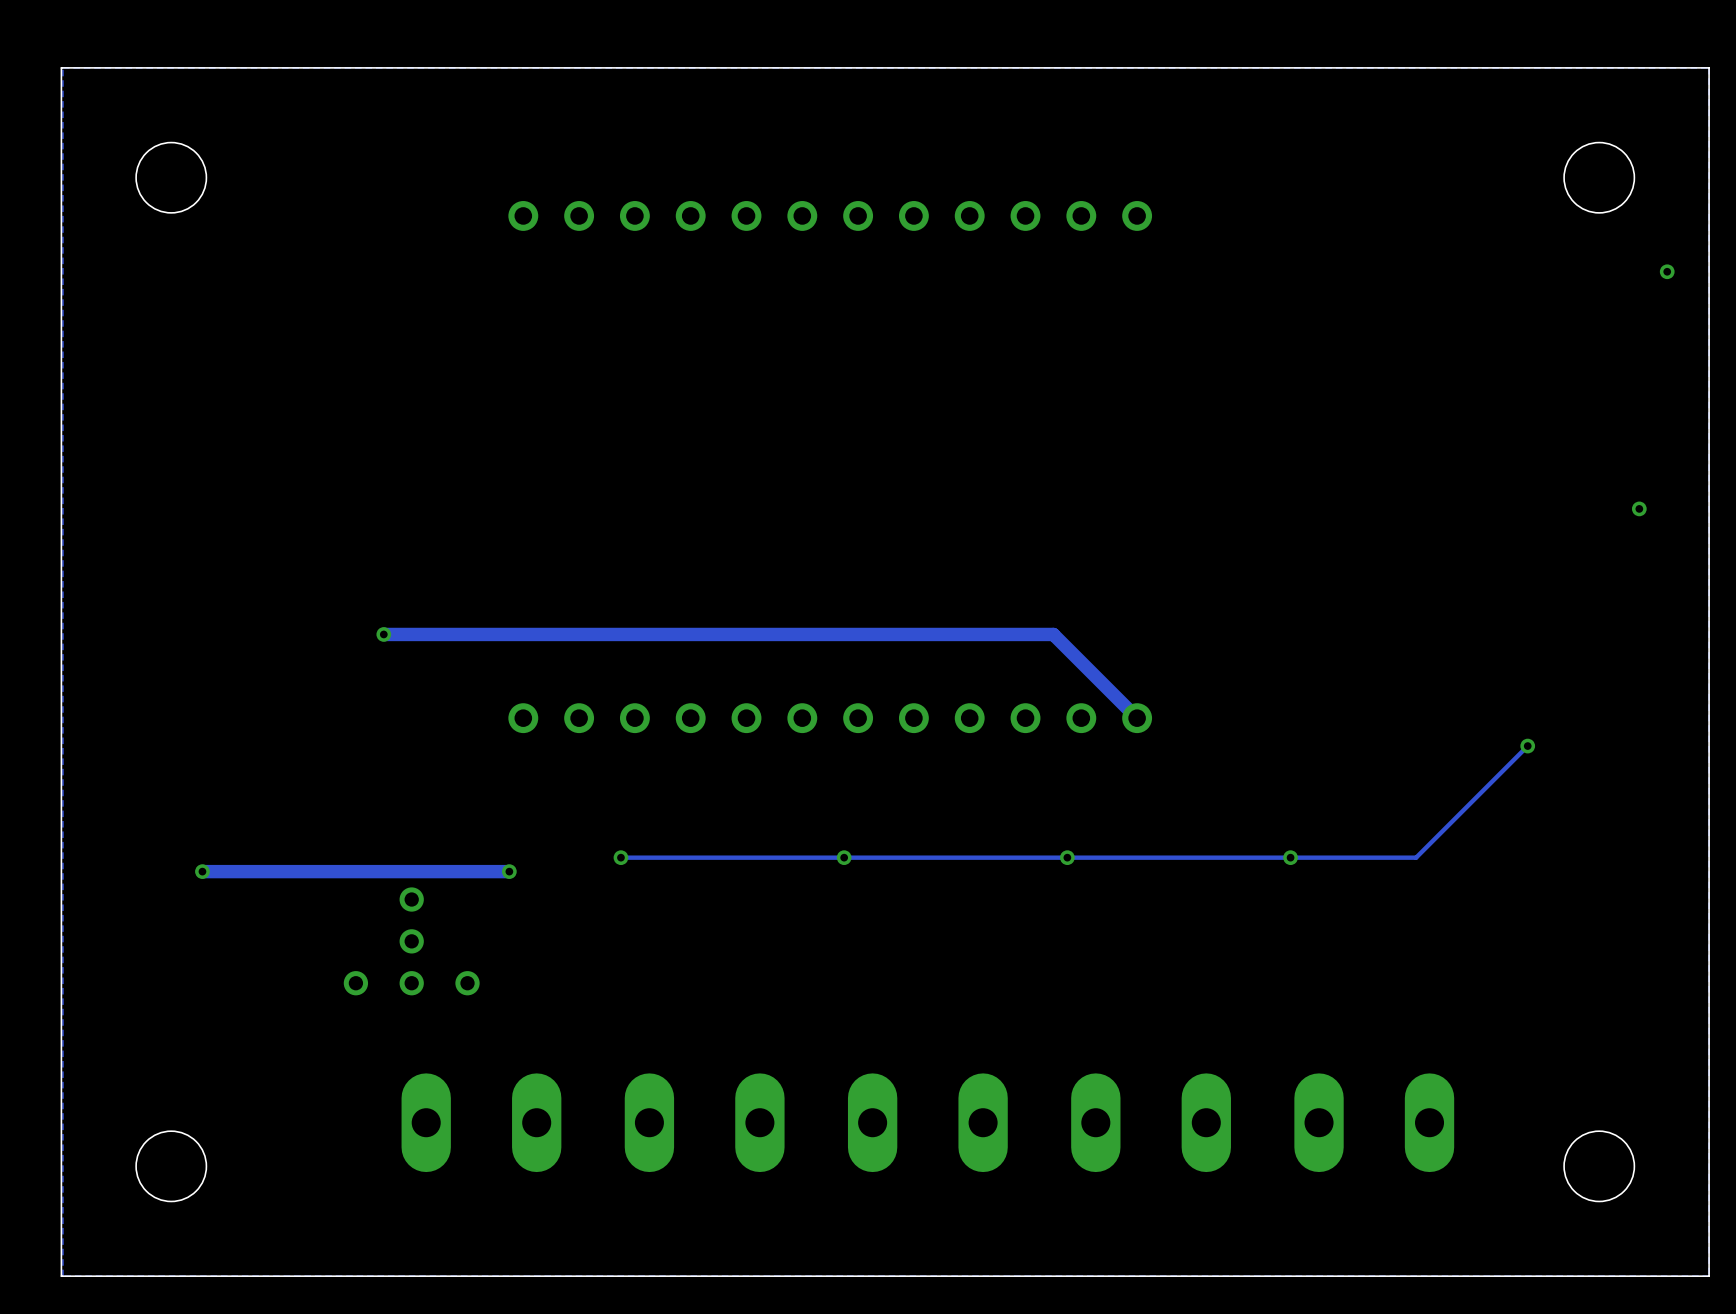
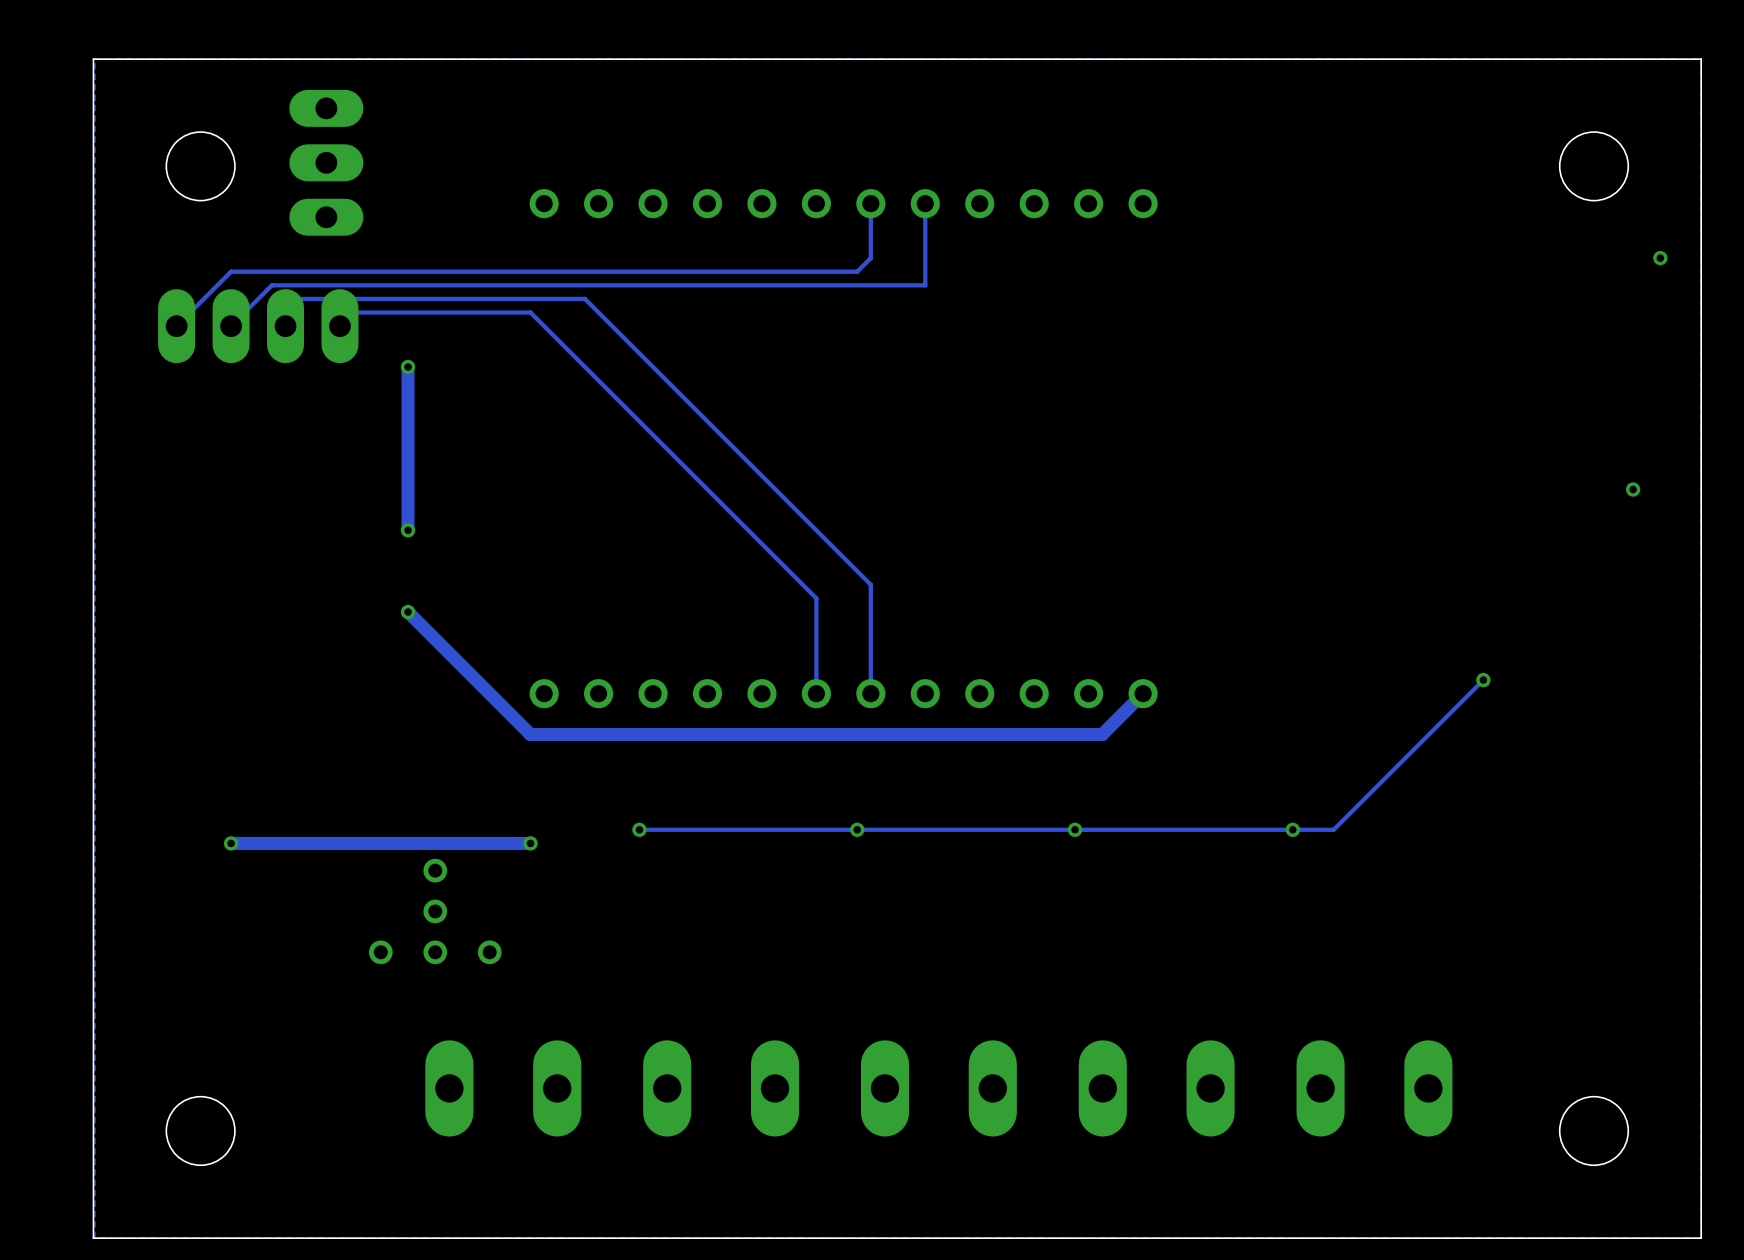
part: none -> (326, 162)
track: none -> (870, 203) (870, 258) (857, 271) (231, 271) (176, 326)
track: none -> (925, 203) (925, 285) (271, 285) (231, 326)
part: none -> (258, 326)
track: none -> (285, 326) (285, 312) (299, 298) (584, 298) (870, 584) (870, 693)
track: none -> (339, 326) (353, 312) (530, 312) (816, 598) (816, 693)
track: none -> (408, 366) (408, 530)
via: none -> (408, 366)
via: none -> (408, 530)
track: (383, 634) (1053, 634) (1137, 718) -> (408, 612) (530, 734) (1102, 734) (1143, 693)
track: (1527, 746) (1416, 857) (1332, 857) -> (1483, 680) (1333, 829)
via position: (1527, 746) -> (1483, 680)

